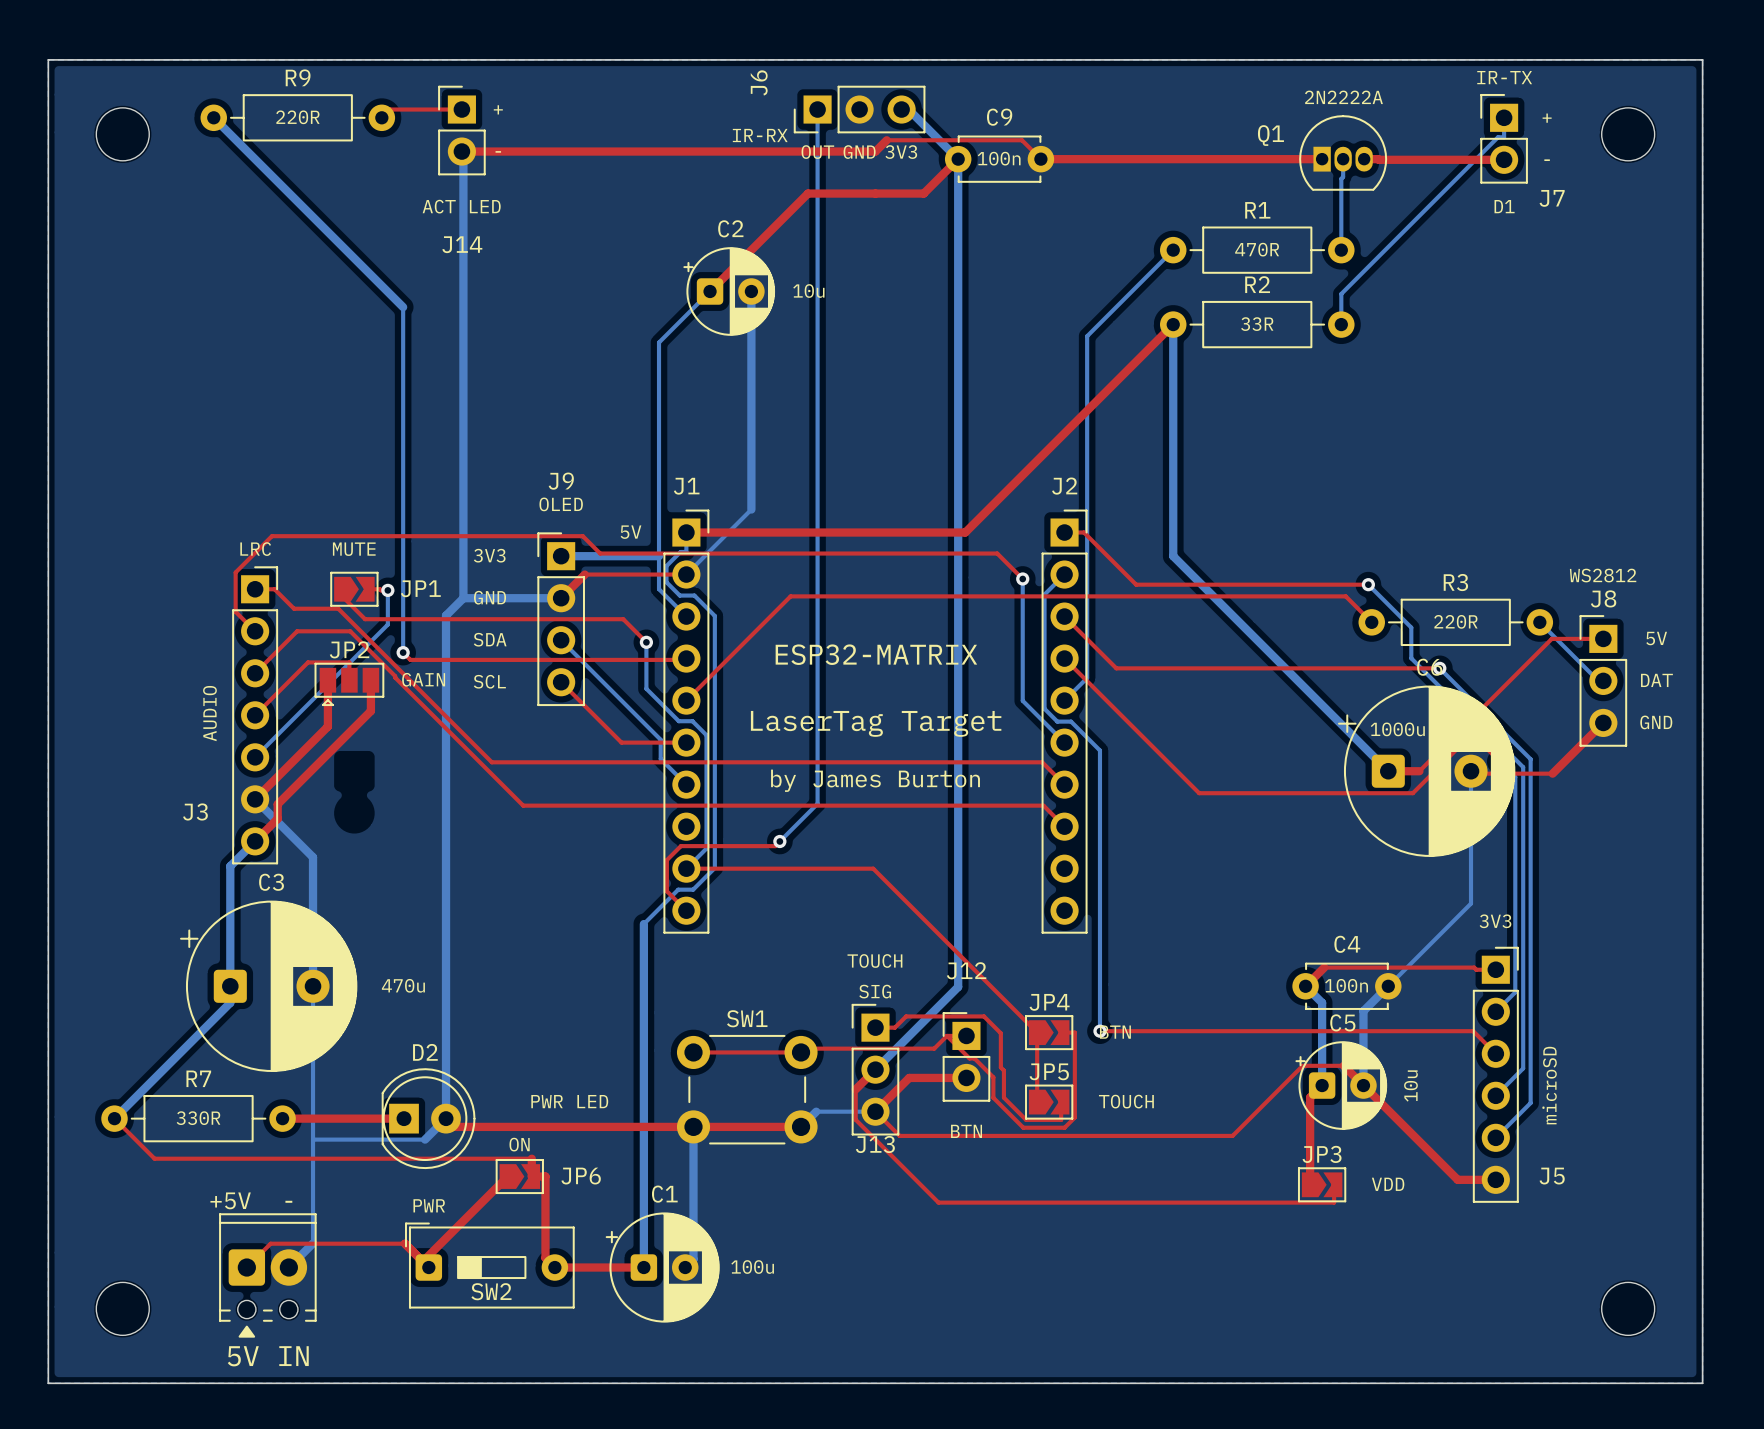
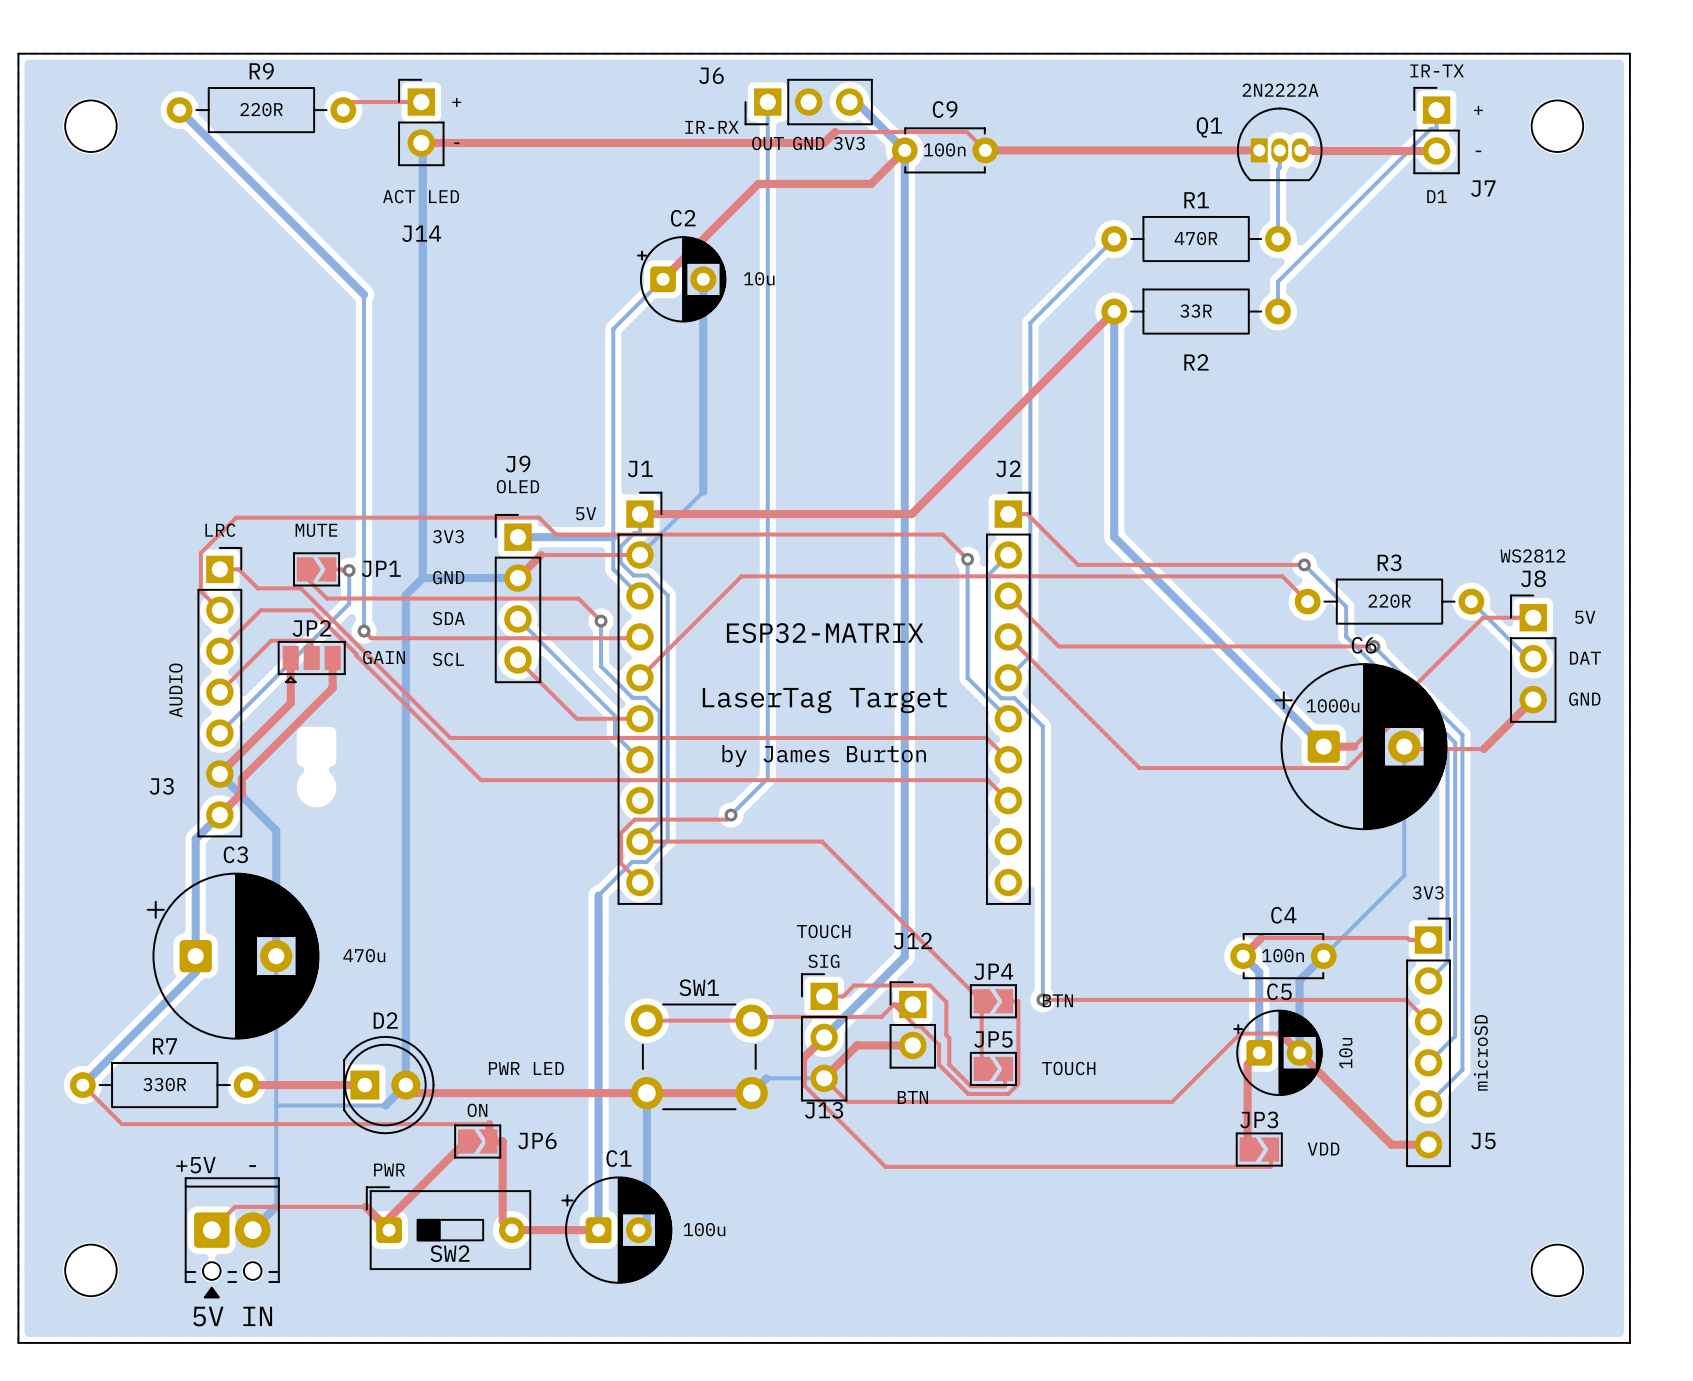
J6 name rotation: 0° (759, 82) -> 90° clockwise (711, 75)
R2 name position: R2 (1257, 284) -> R2 (1196, 362)

